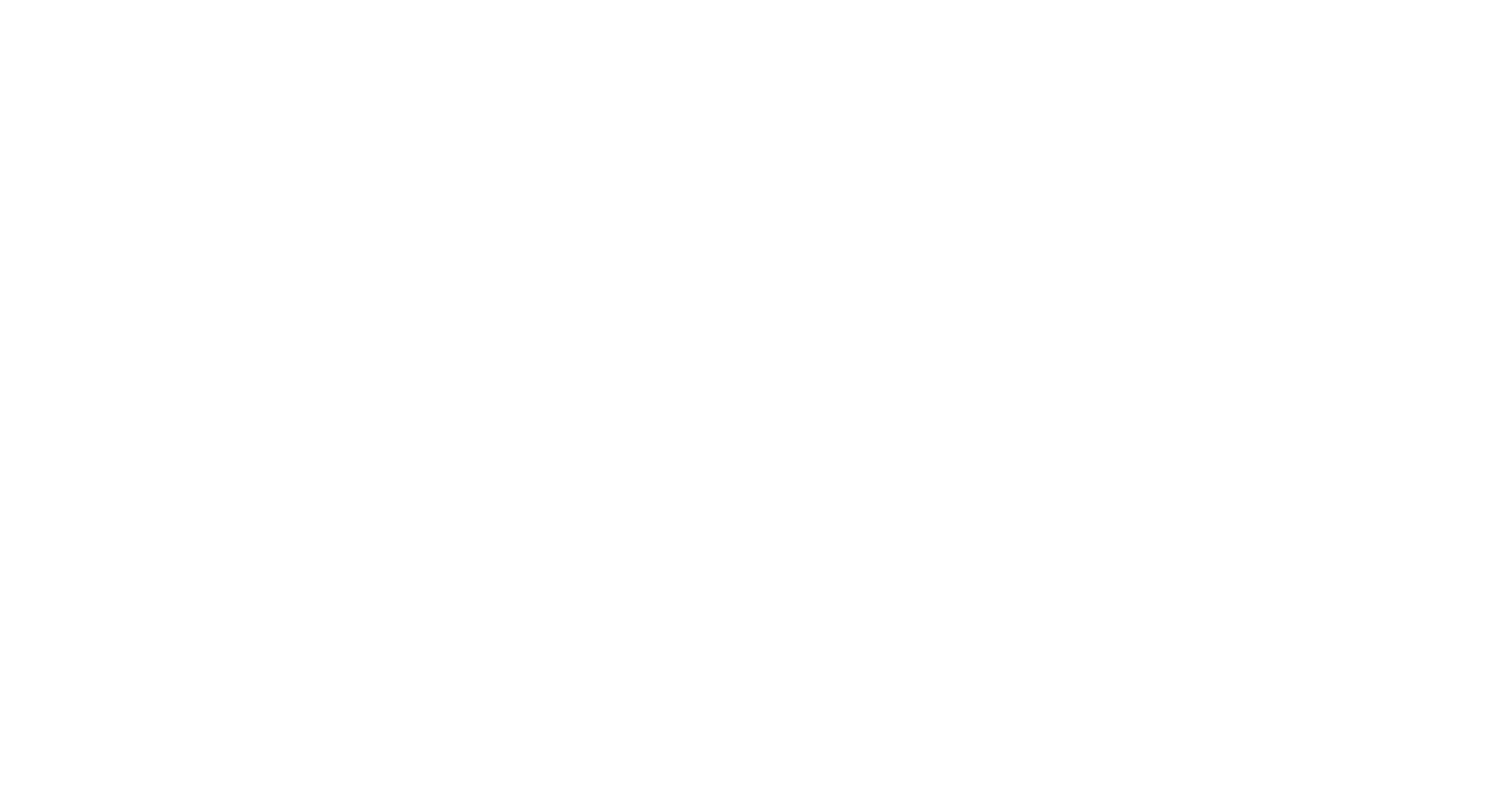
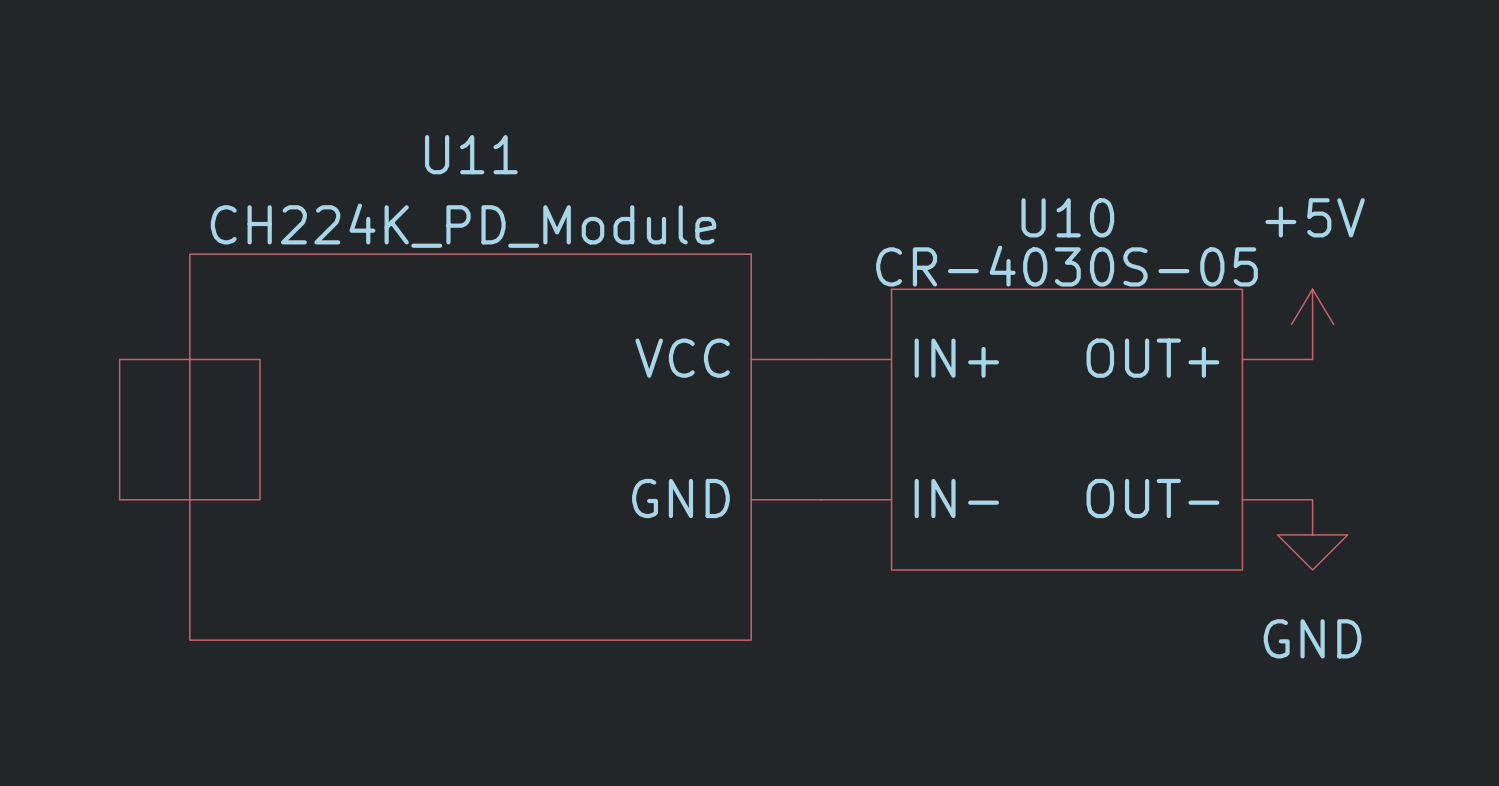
power symbol: none -> +5V (1312, 324)
U10: none -> CR-4030S-05 (1066, 429)
U11: none -> CH224K_PD_Module (470, 447)
power symbol: none -> GND (1312, 534)

